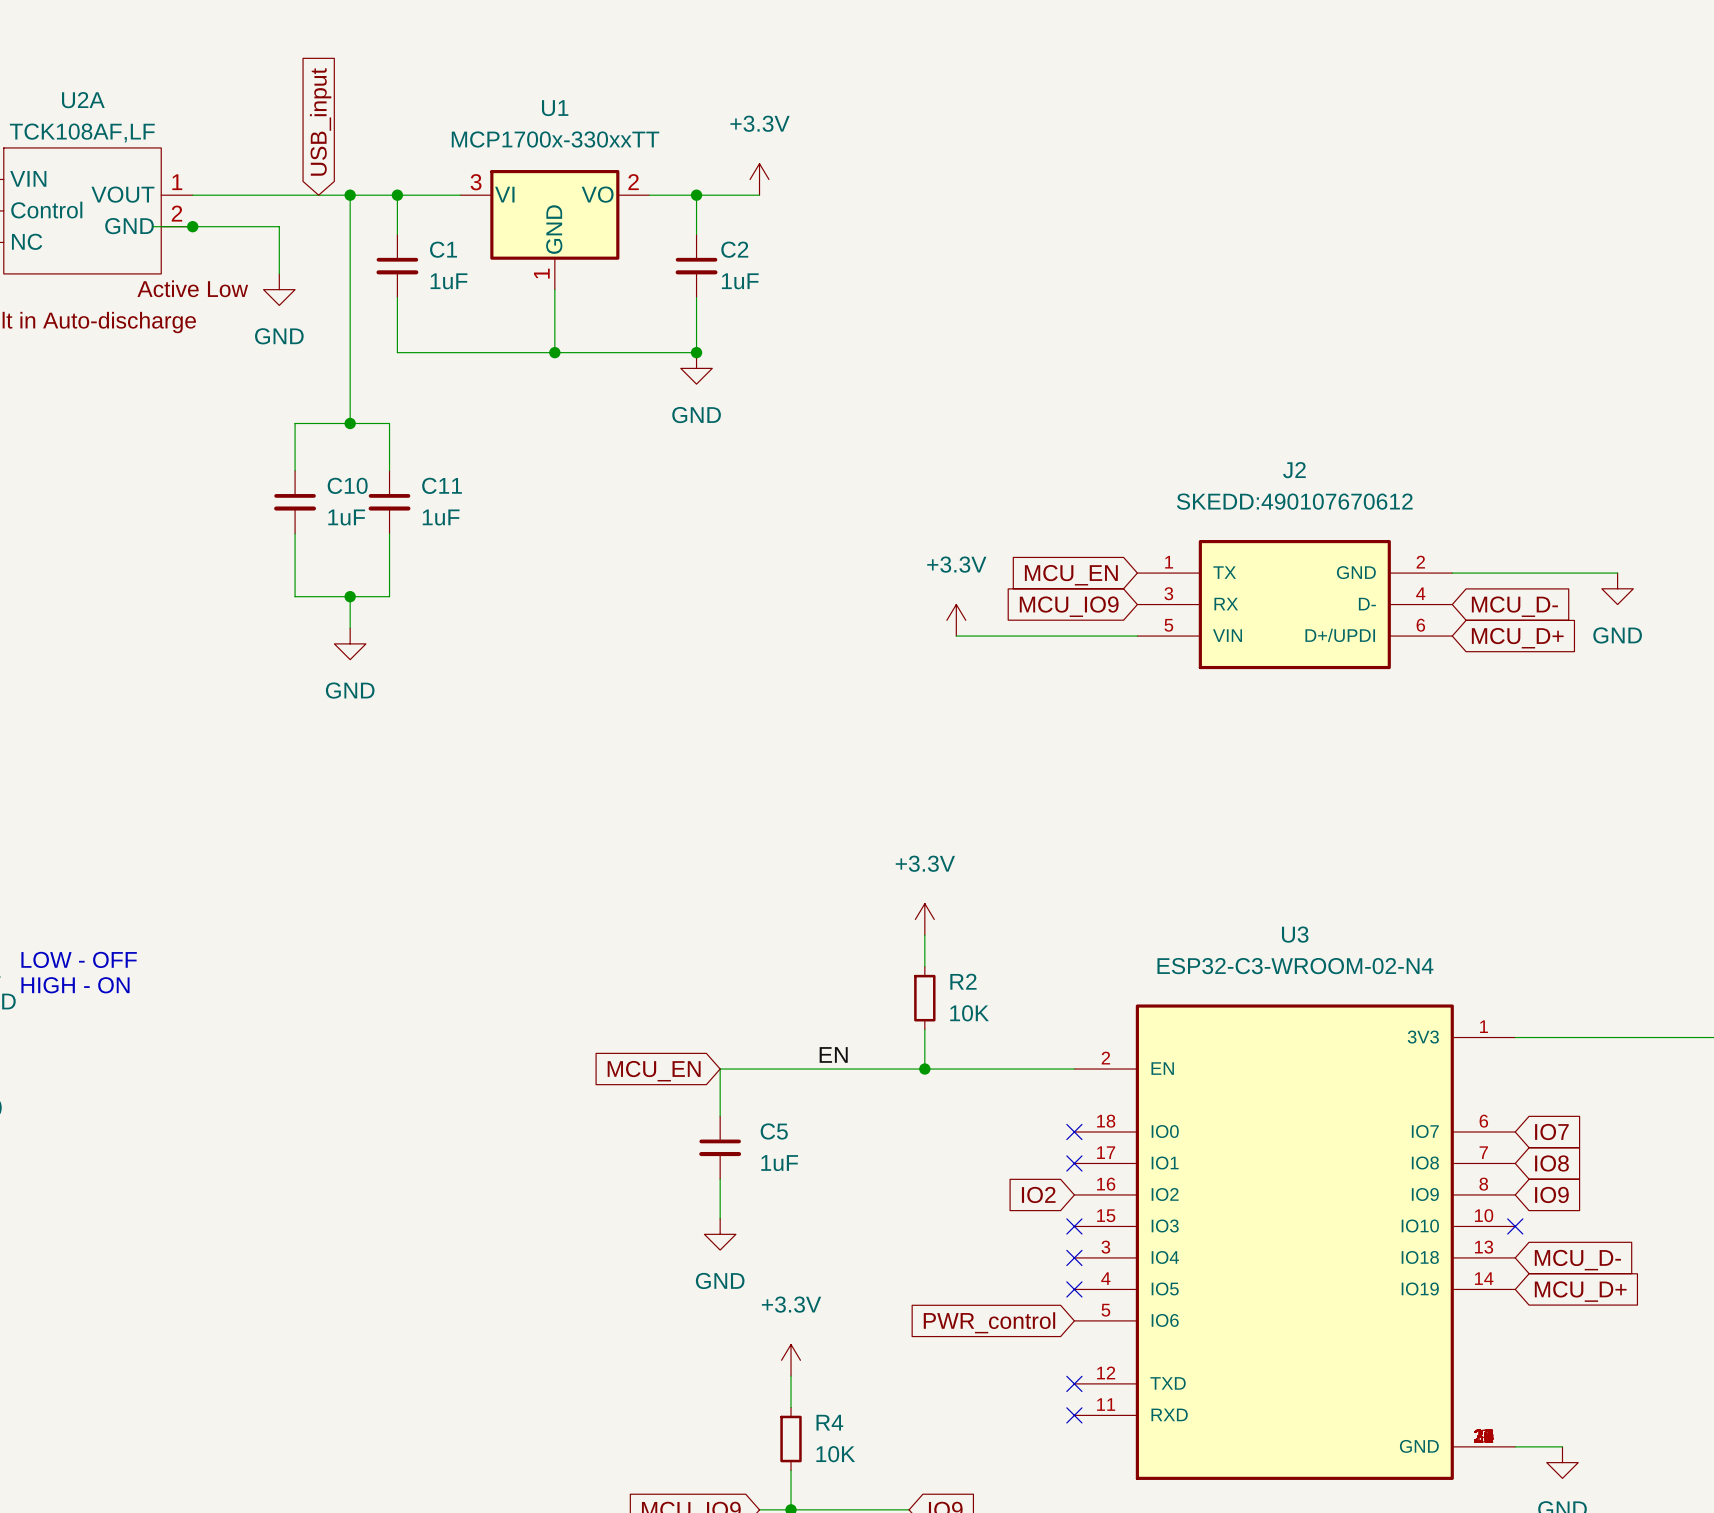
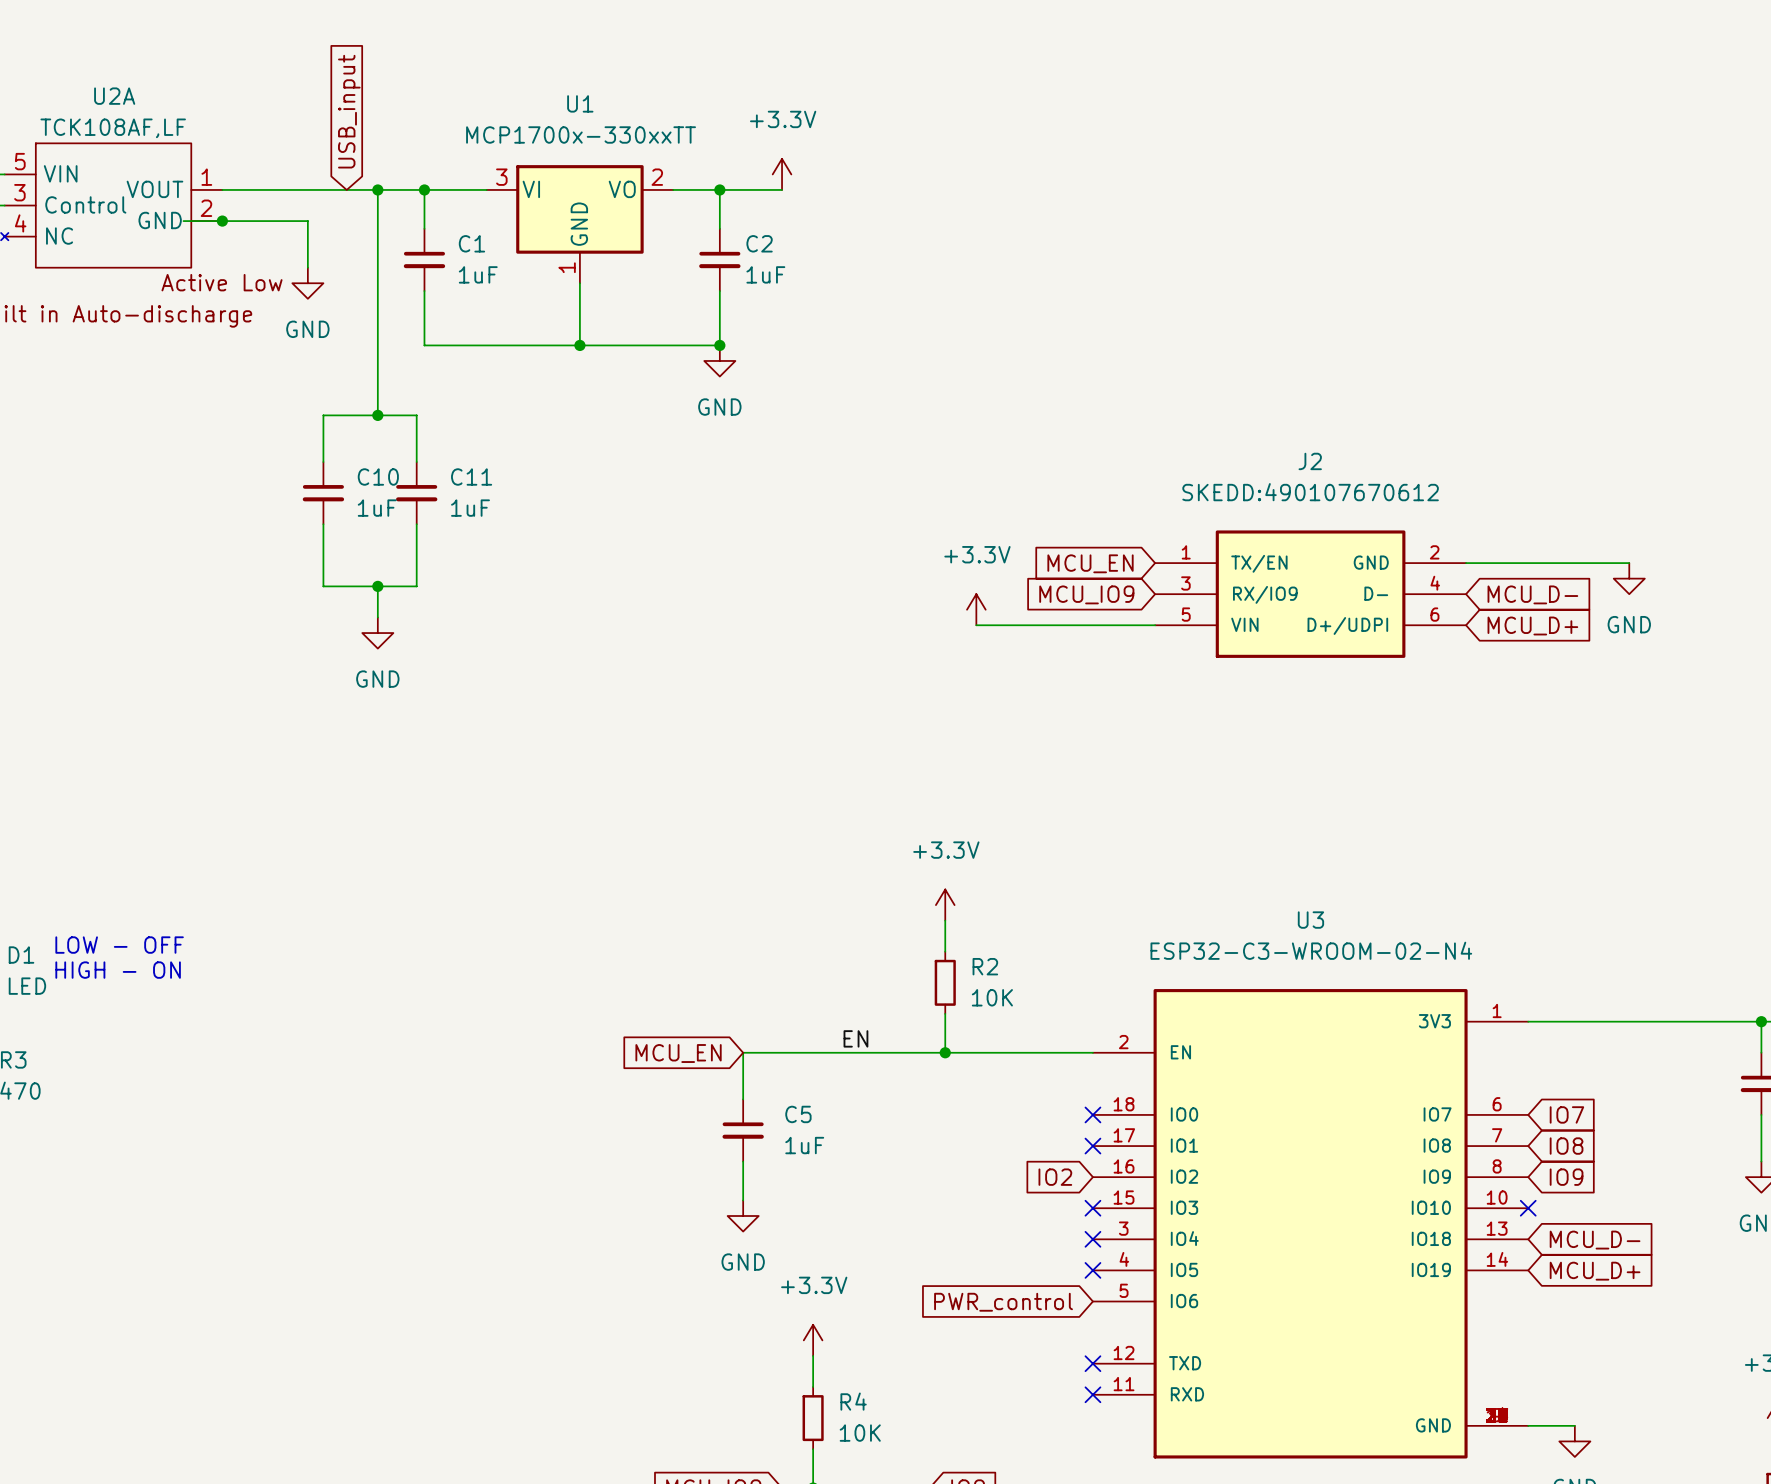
J2 pin name: TX (1224, 572) -> TX/EN (1259, 563)
J2 pin name: RX (1226, 604) -> RX/IO9 (1265, 594)
J2 pin name: D+/UPDI (1340, 635) -> D+/UDPI (1347, 625)

